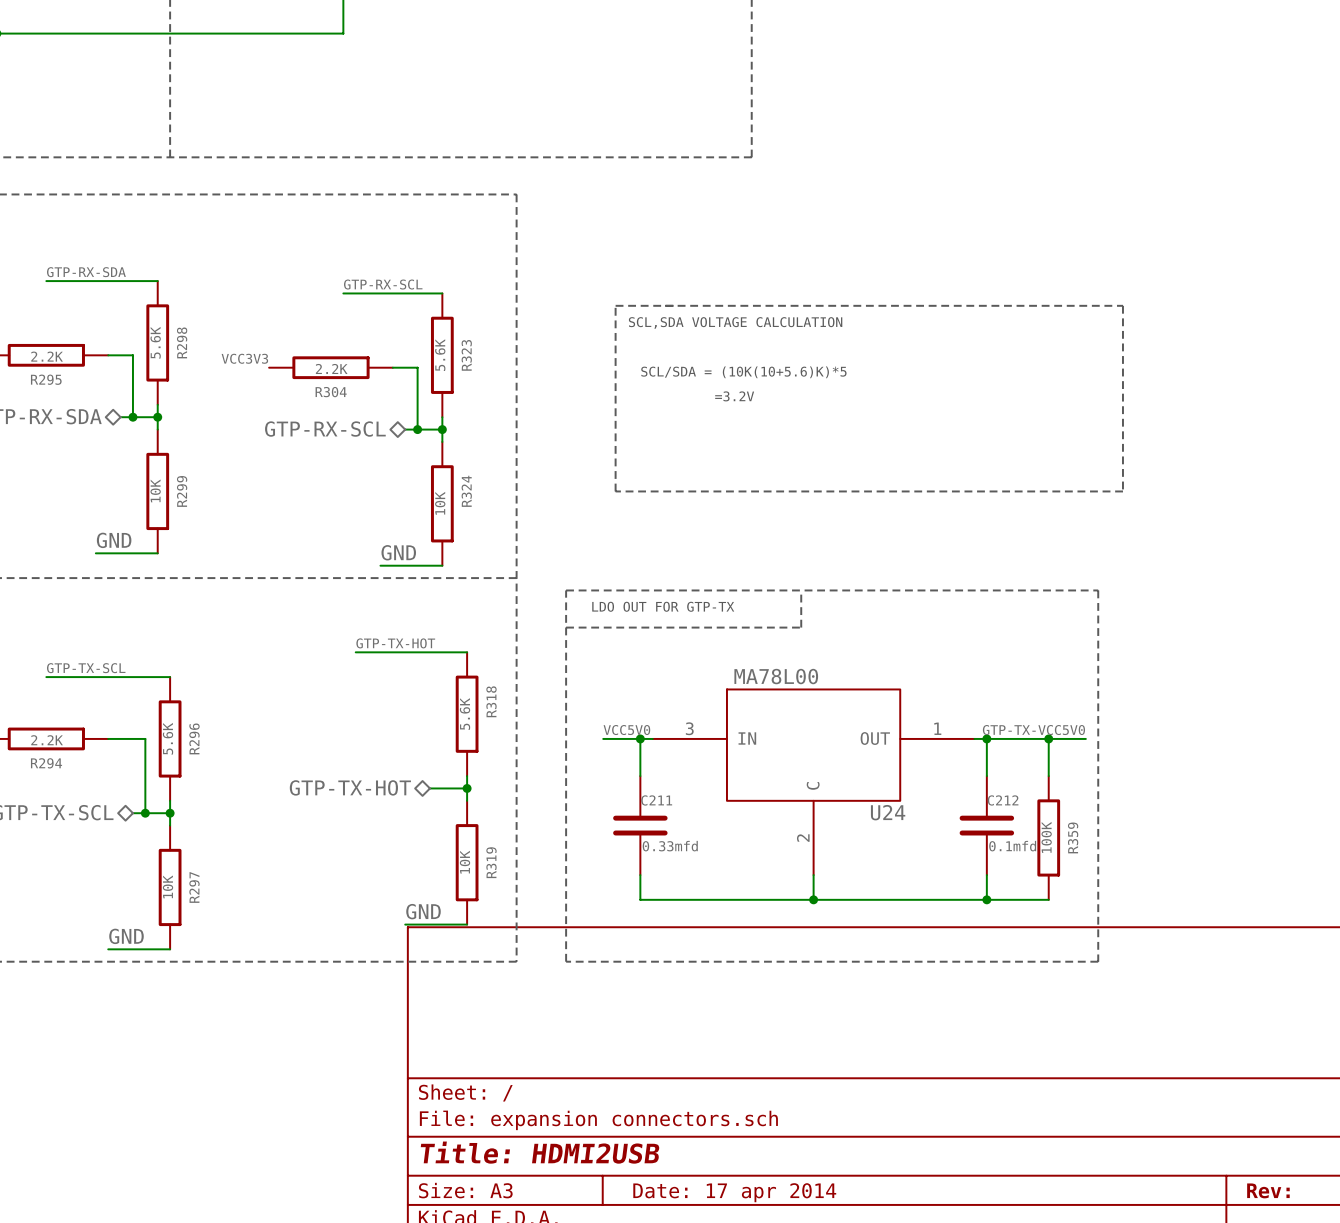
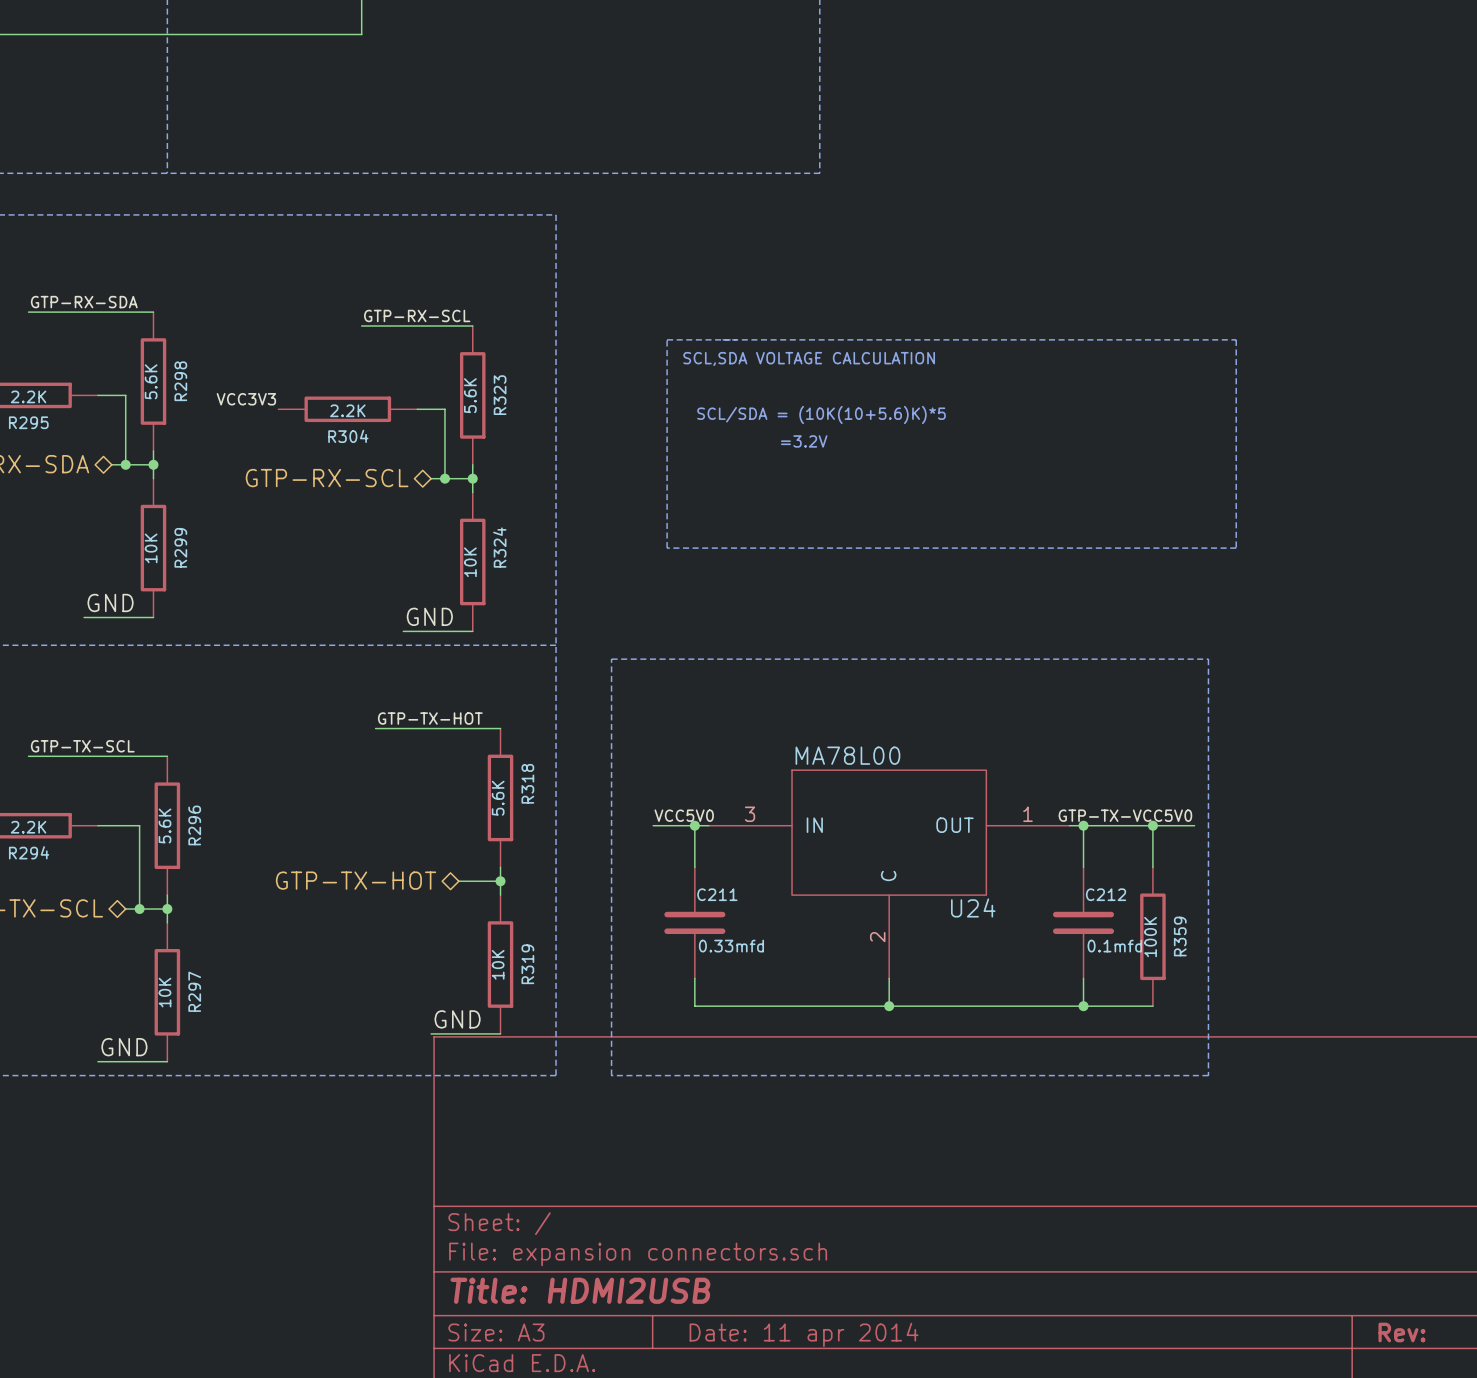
line: (801, 590) (801, 627) (566, 627) -> none
text: LDO OUT FOR GTP-TX (663, 606) -> none
title block: Date: 17 apr 2014 (734, 1192) -> Date: 11 apr 2014 (804, 1334)

